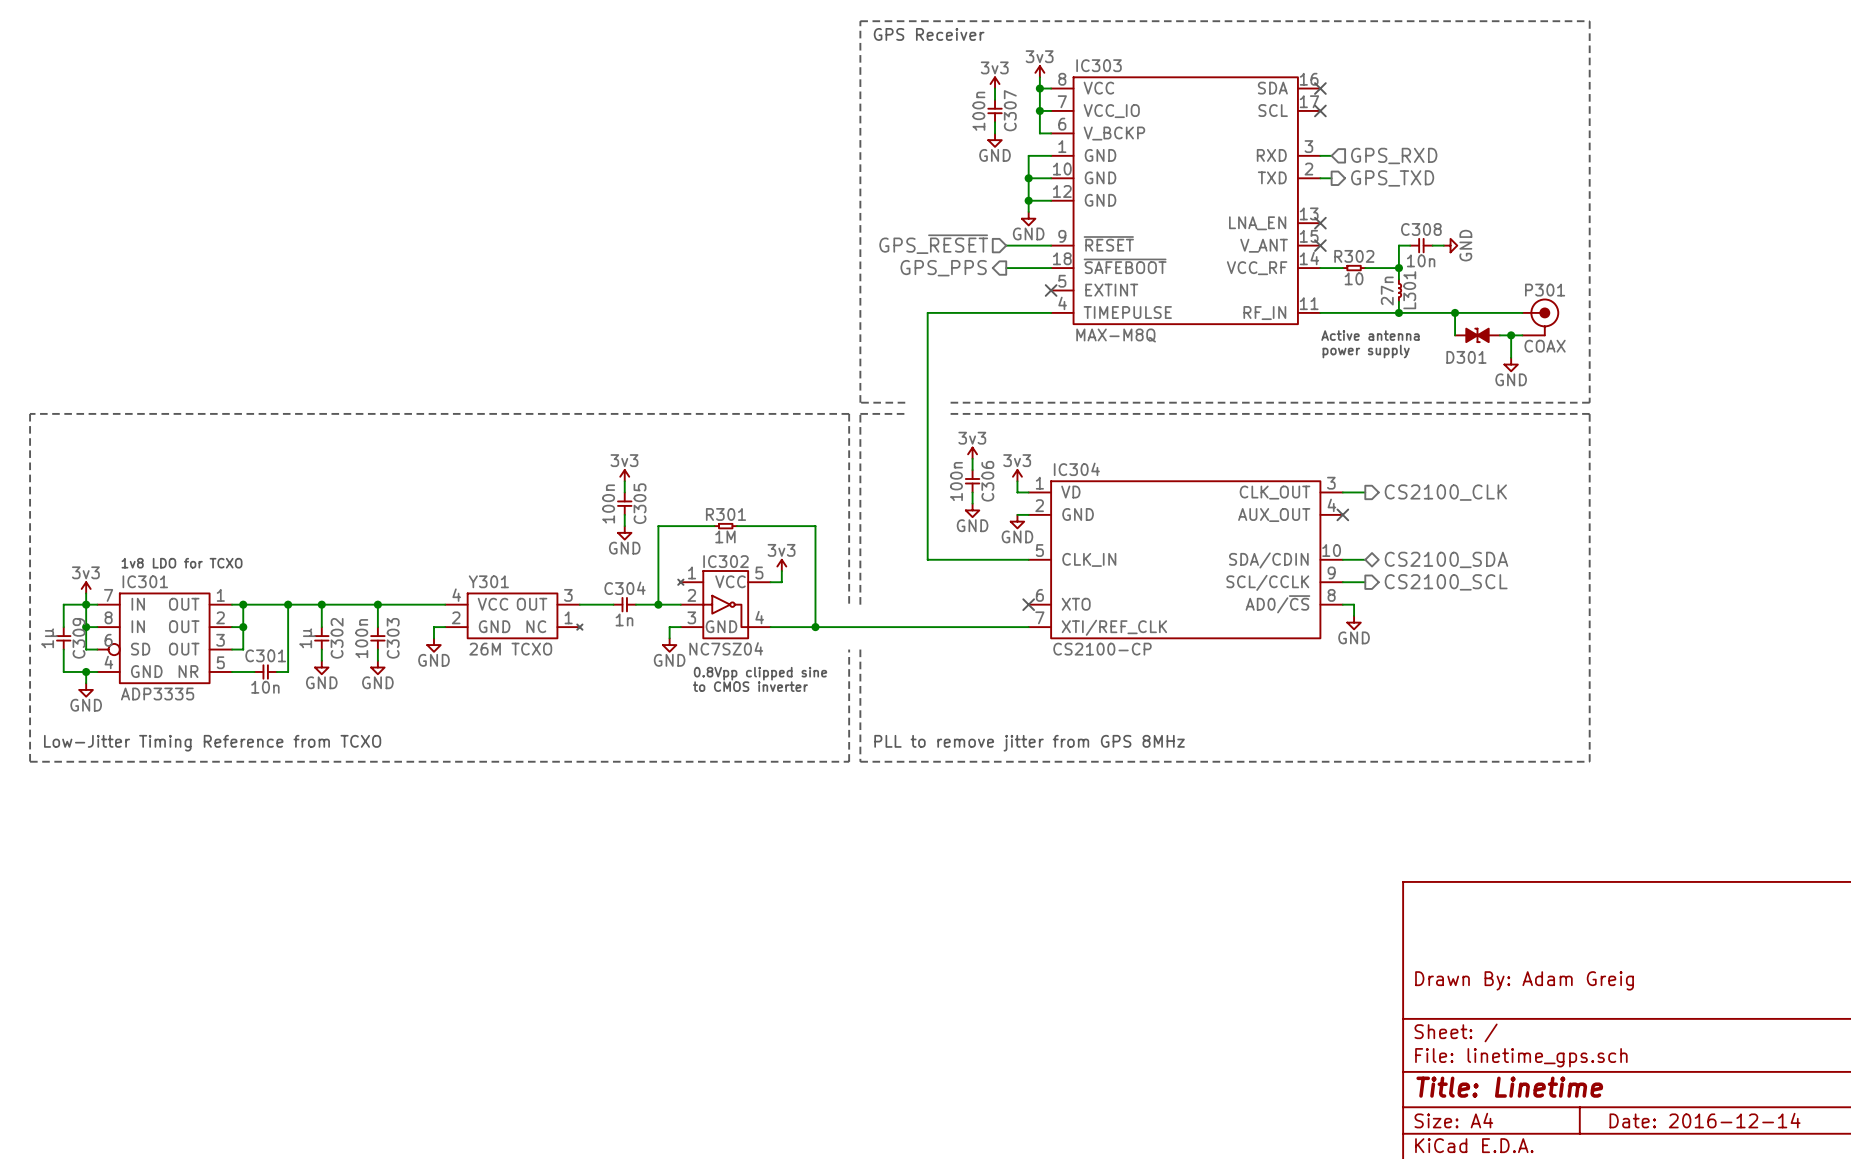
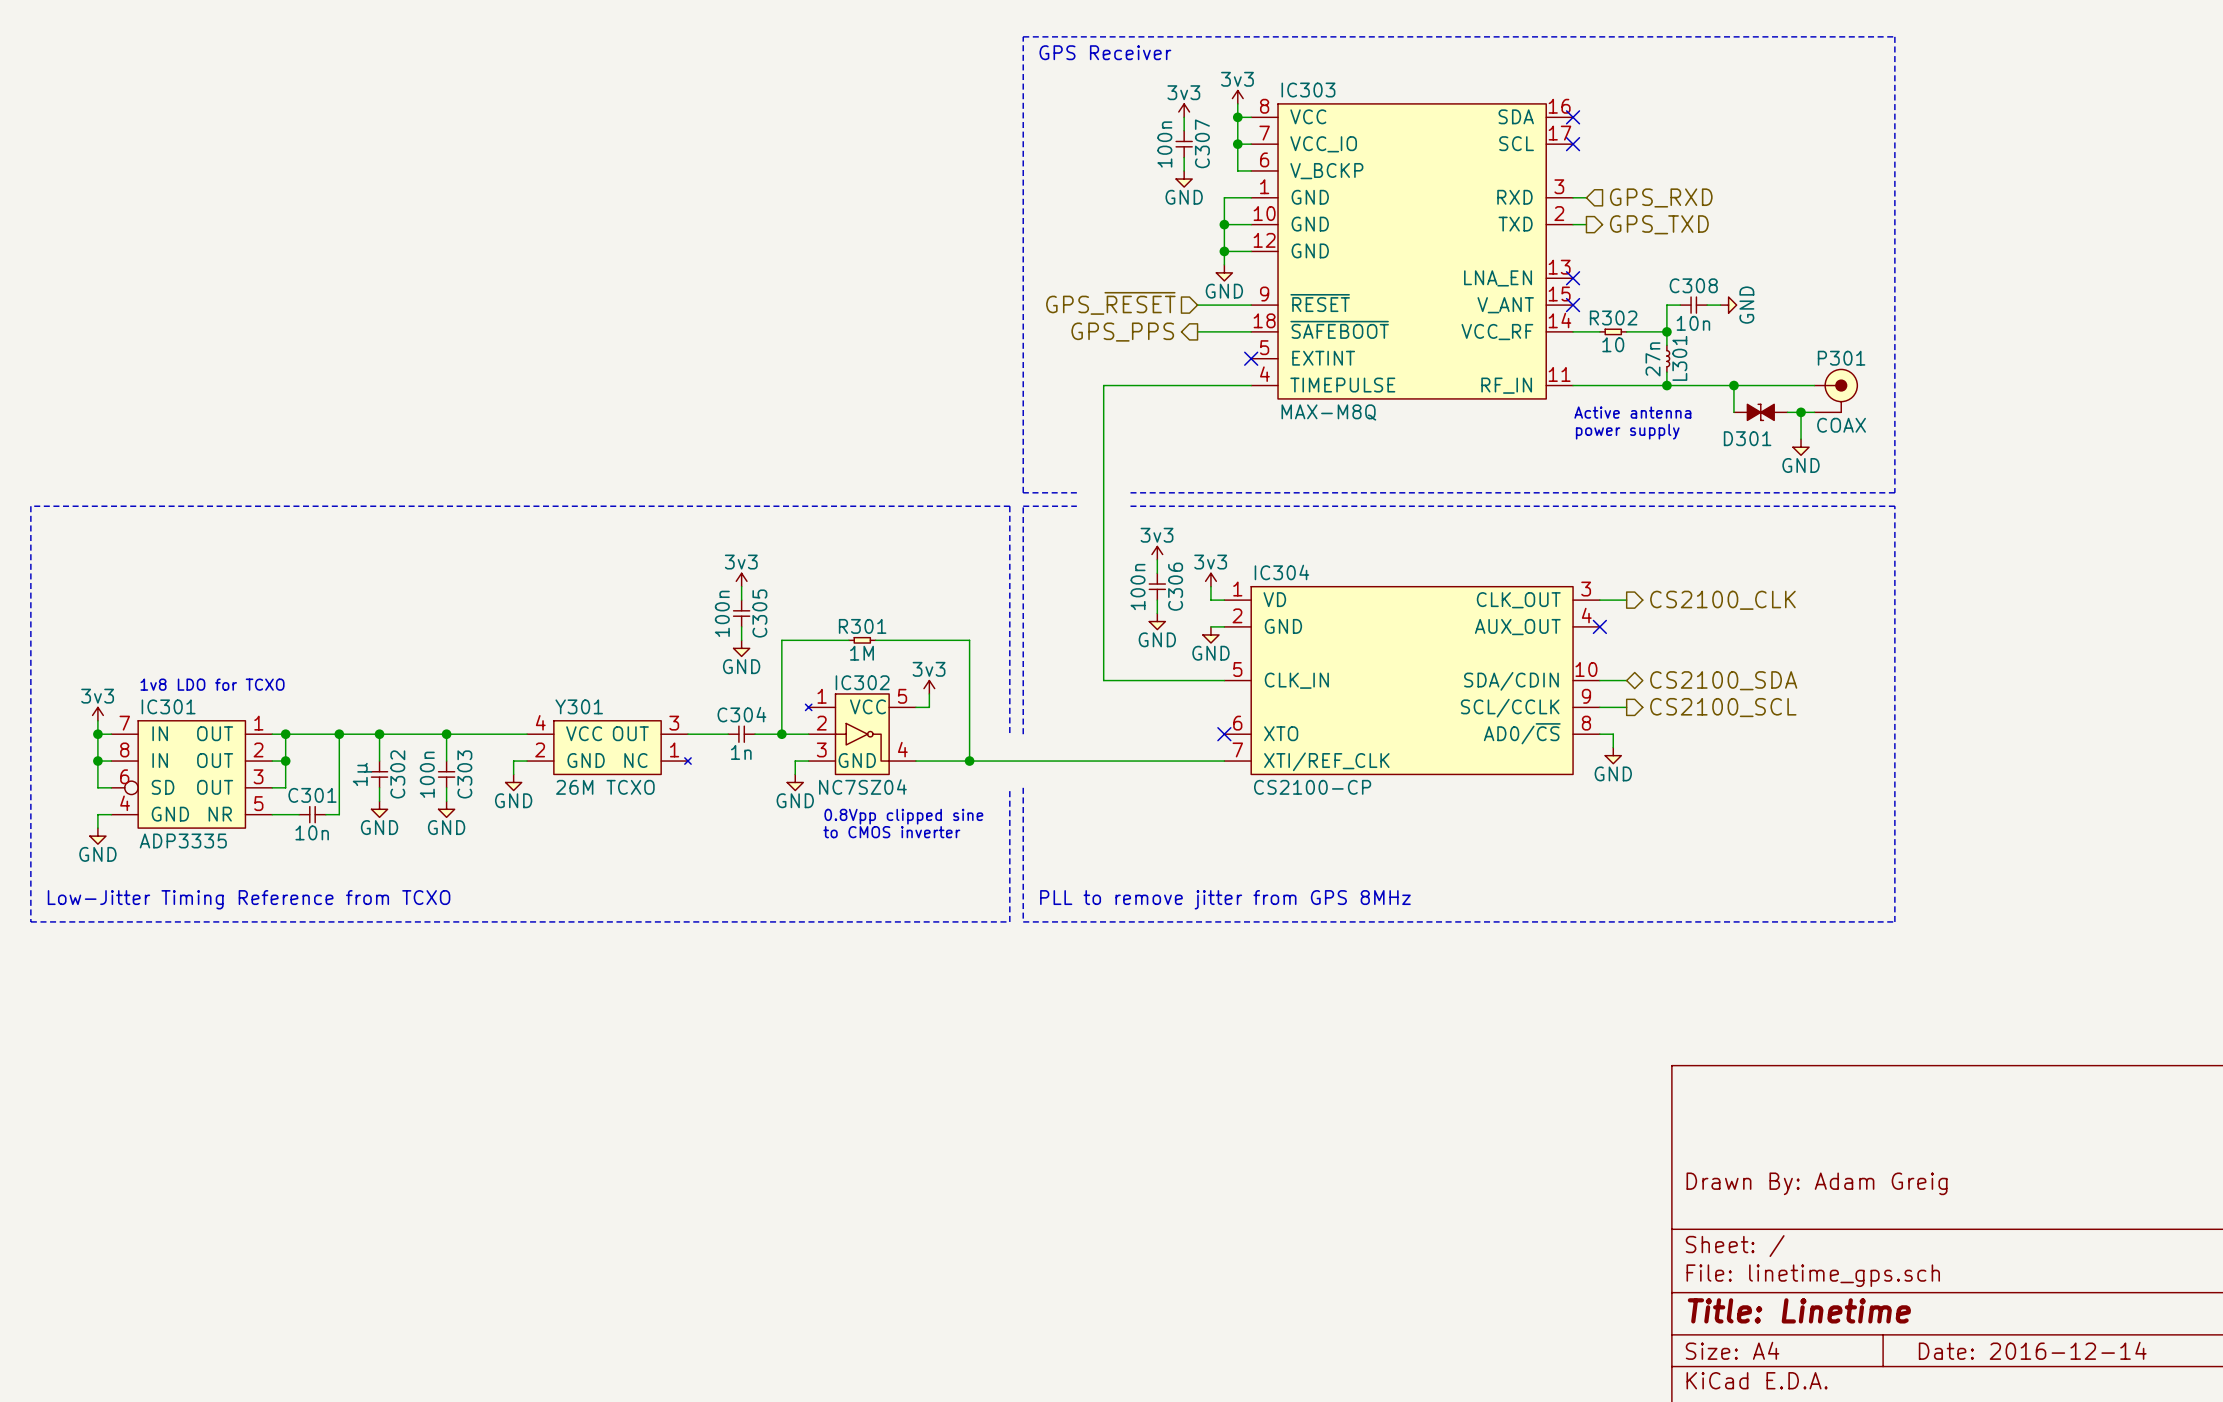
wire: (86, 604) (63, 604) (63, 627) -> none
C309: 1µ (63, 638) -> none
wire: (63, 649) (63, 671) (86, 671) -> none
junction: (86, 671) -> none

